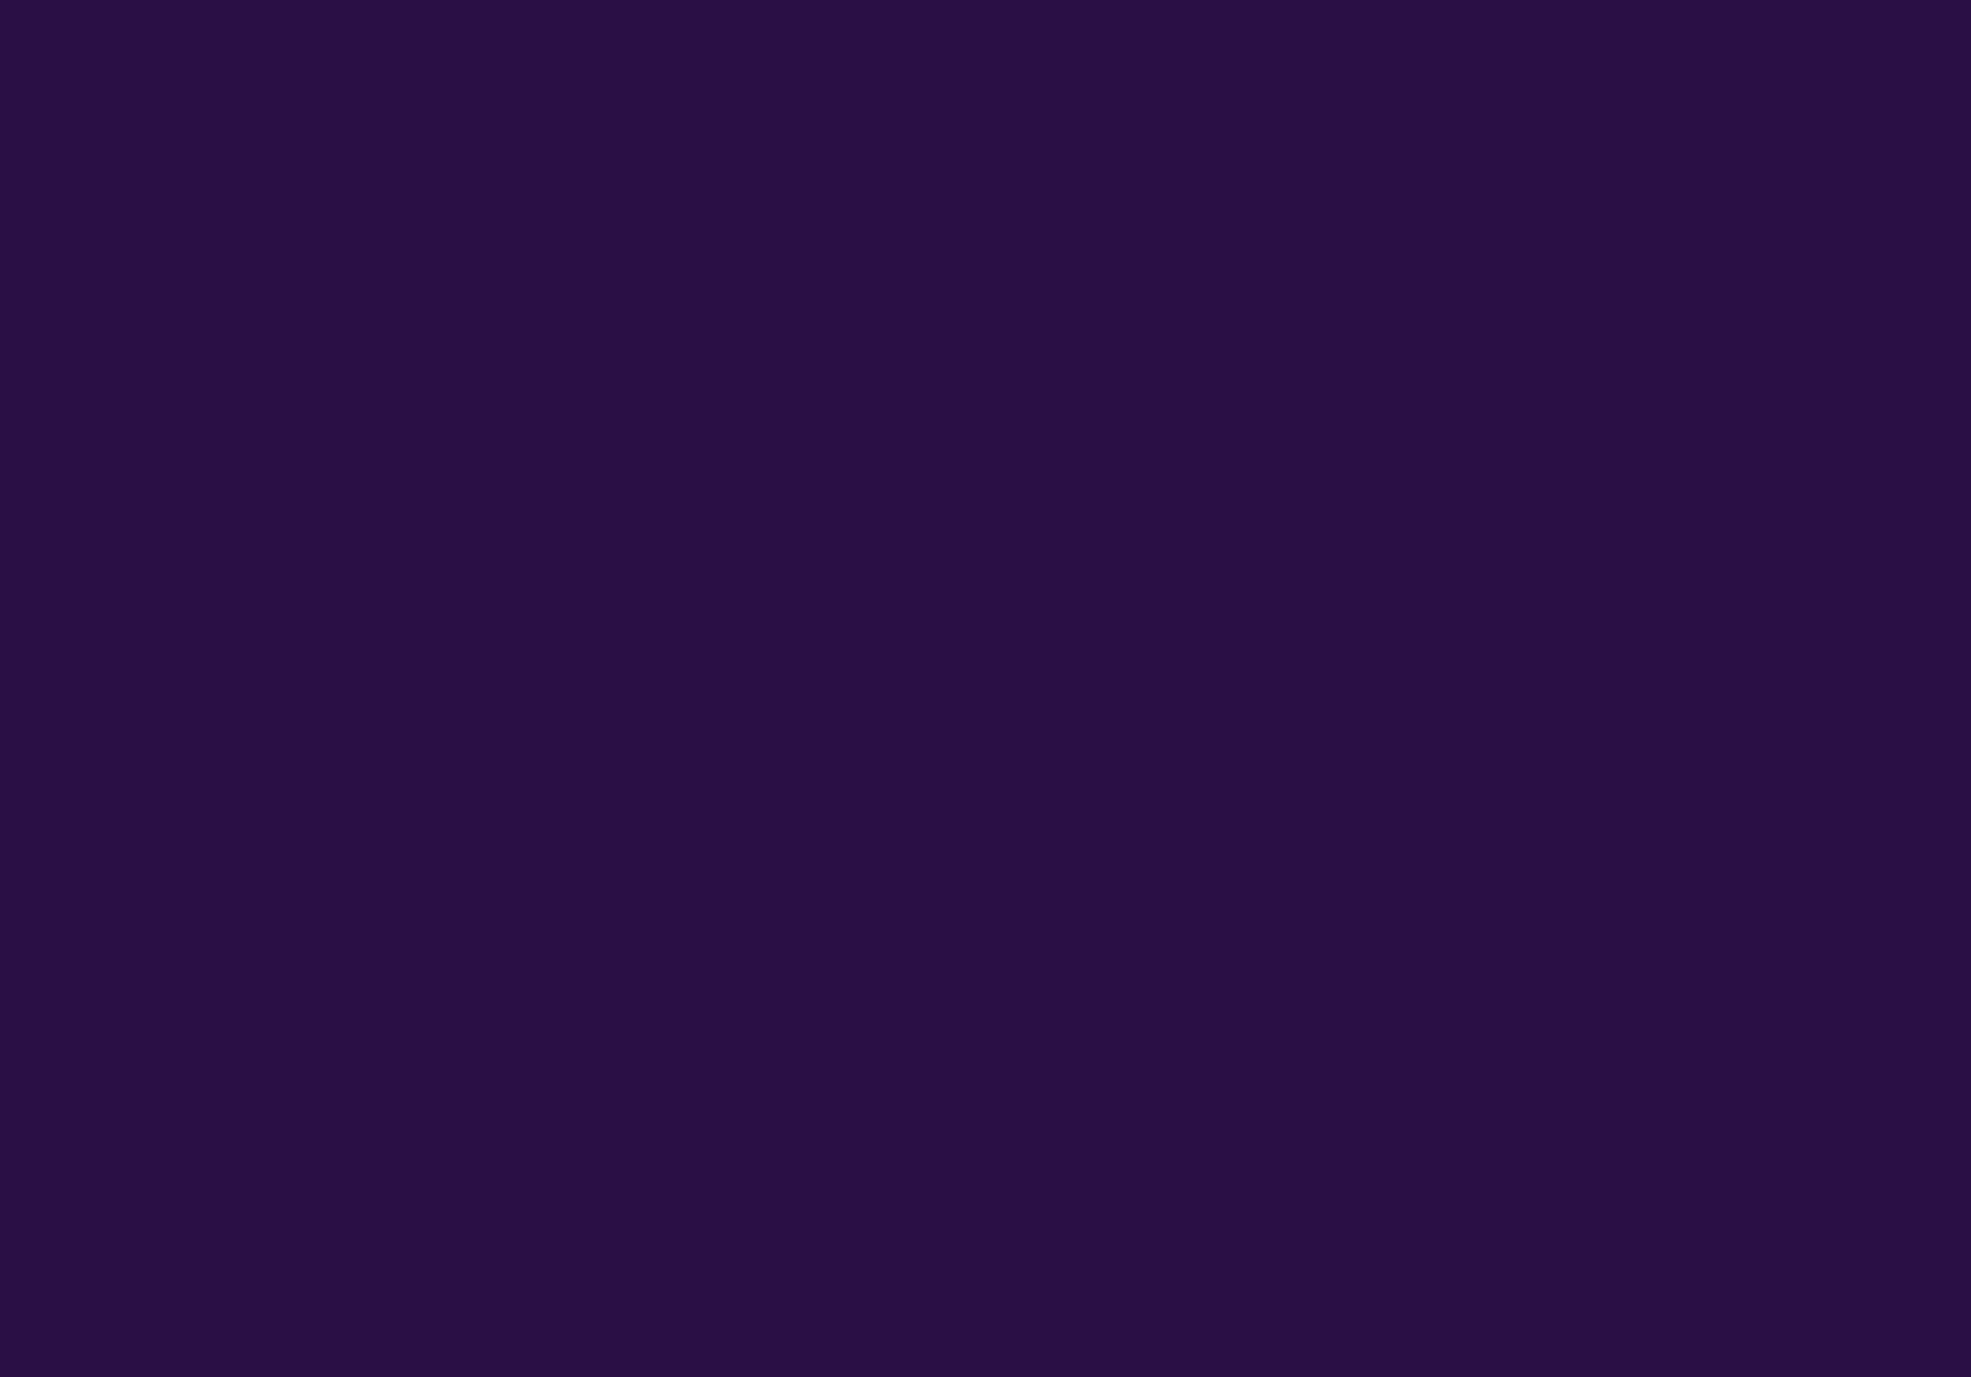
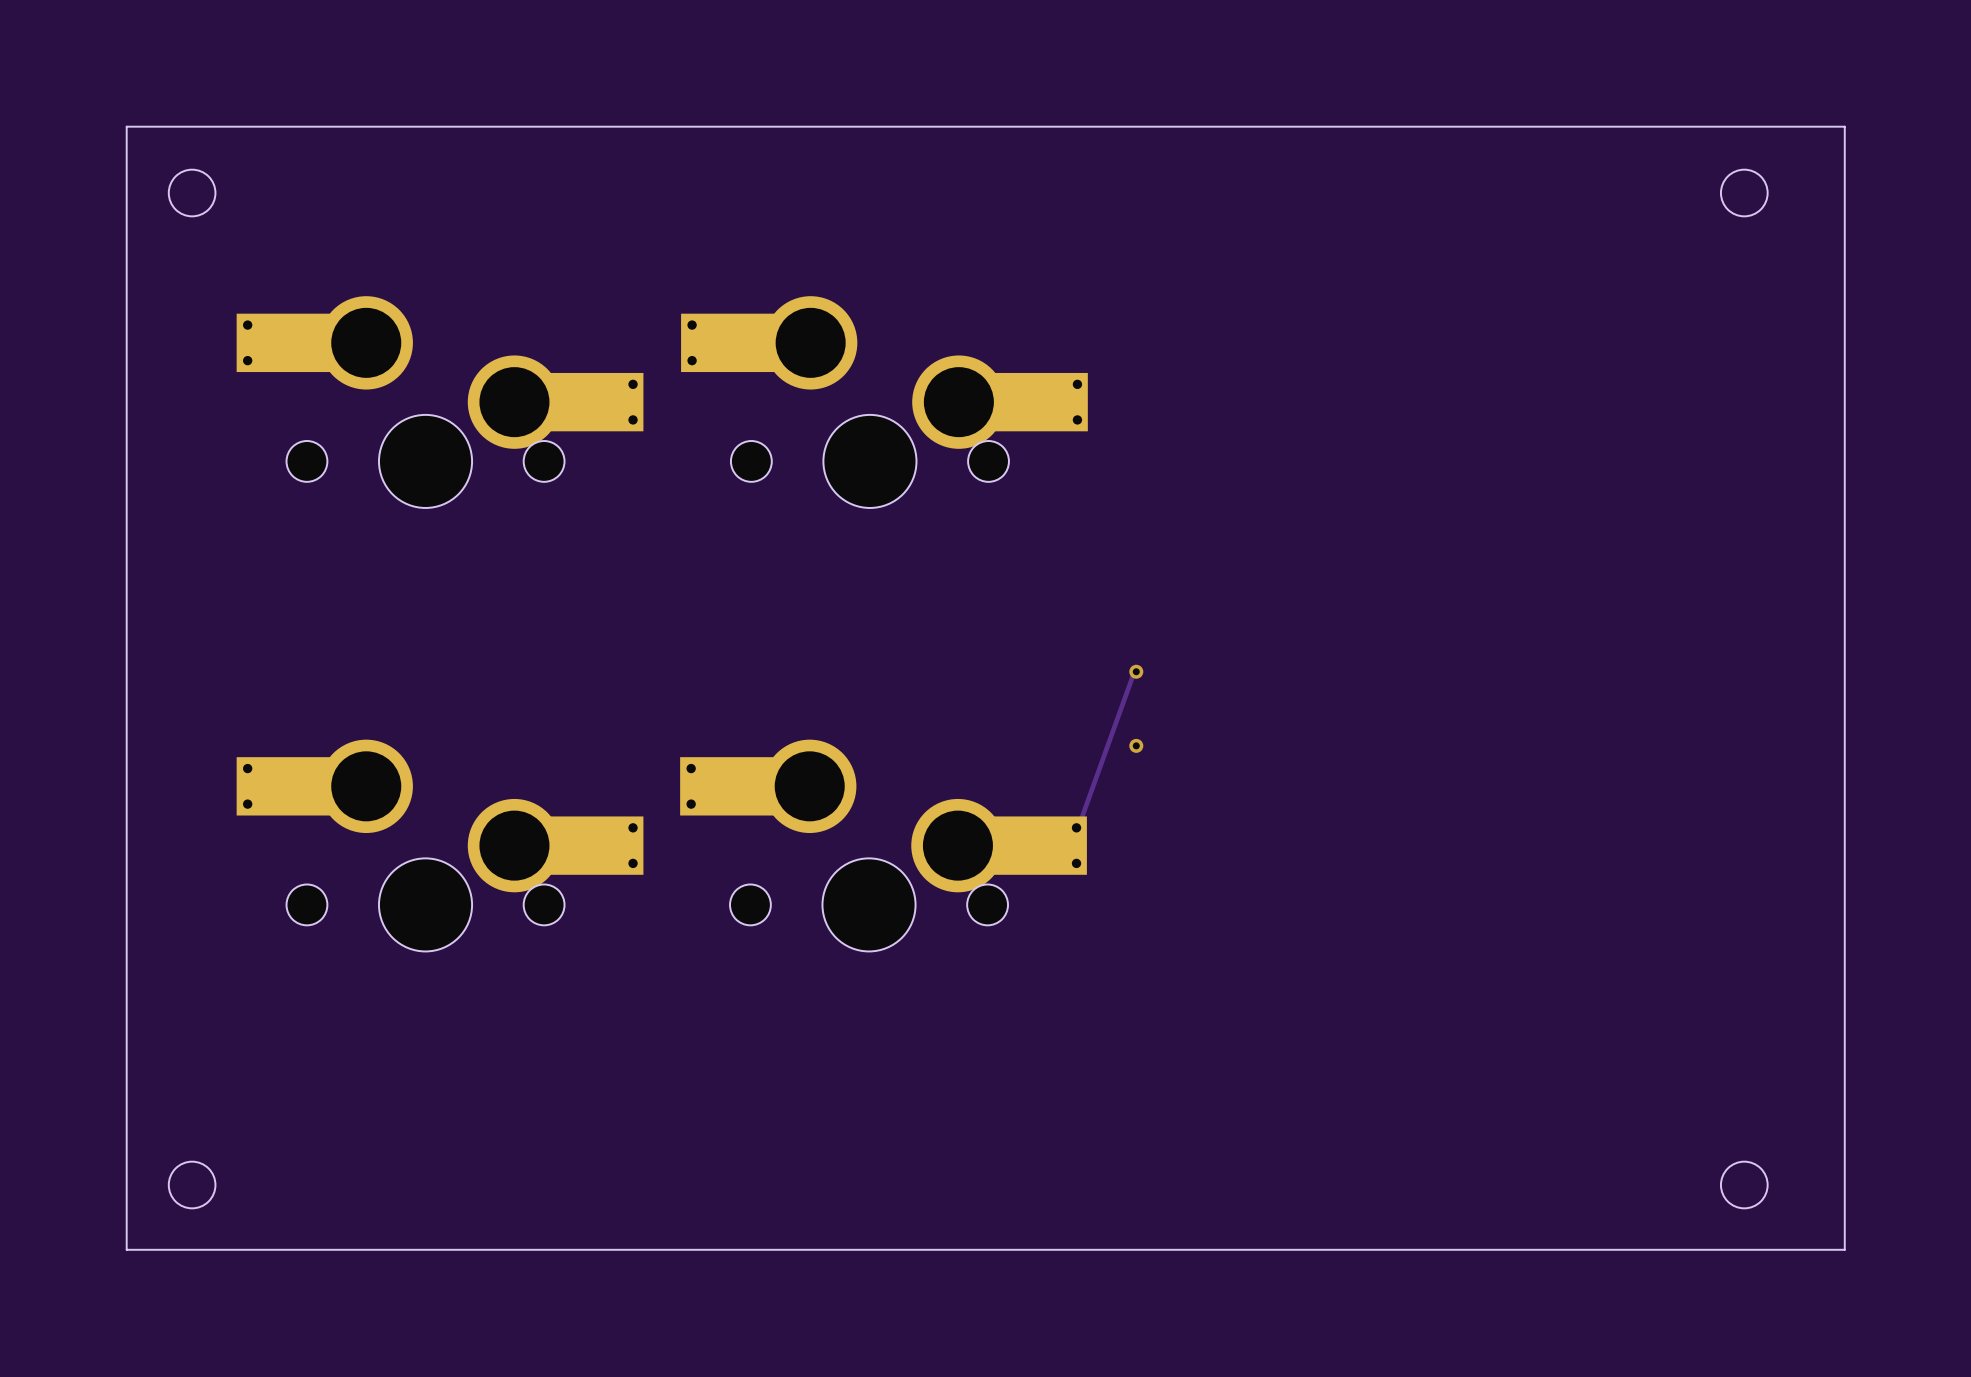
board edge: none -> (1844, 126) (126, 126) (126, 1249) (1844, 1249) (1844, 126)
round board edge: none -> [168, 169, 217, 217]
round board edge: none -> [1720, 169, 1769, 217]
part: none -> (440, 402)
part: none -> (884, 402)
track: none -> (1139, 668) (1133, 674) (1079, 822)
via: none -> (1136, 671)
via: none -> (1136, 745)
part: none -> (440, 845)
part: none -> (883, 845)
round board edge: none -> [168, 1161, 217, 1209]
round board edge: none -> [1720, 1161, 1769, 1209]

